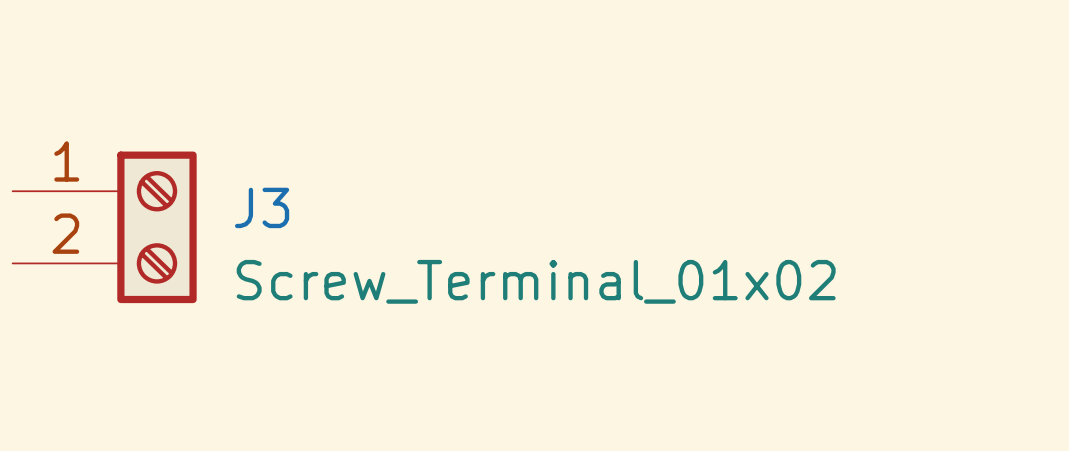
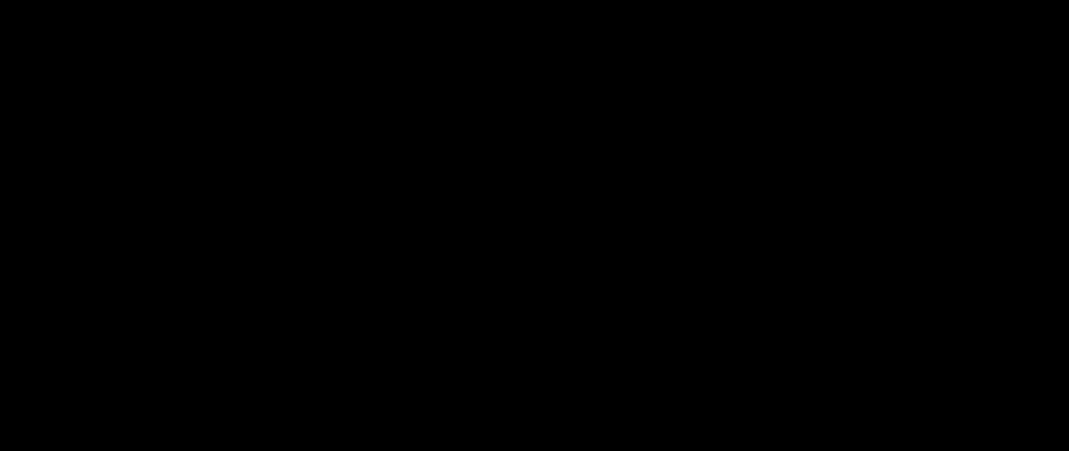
J3: Screw_Terminal_01x02 (104, 227) -> none

